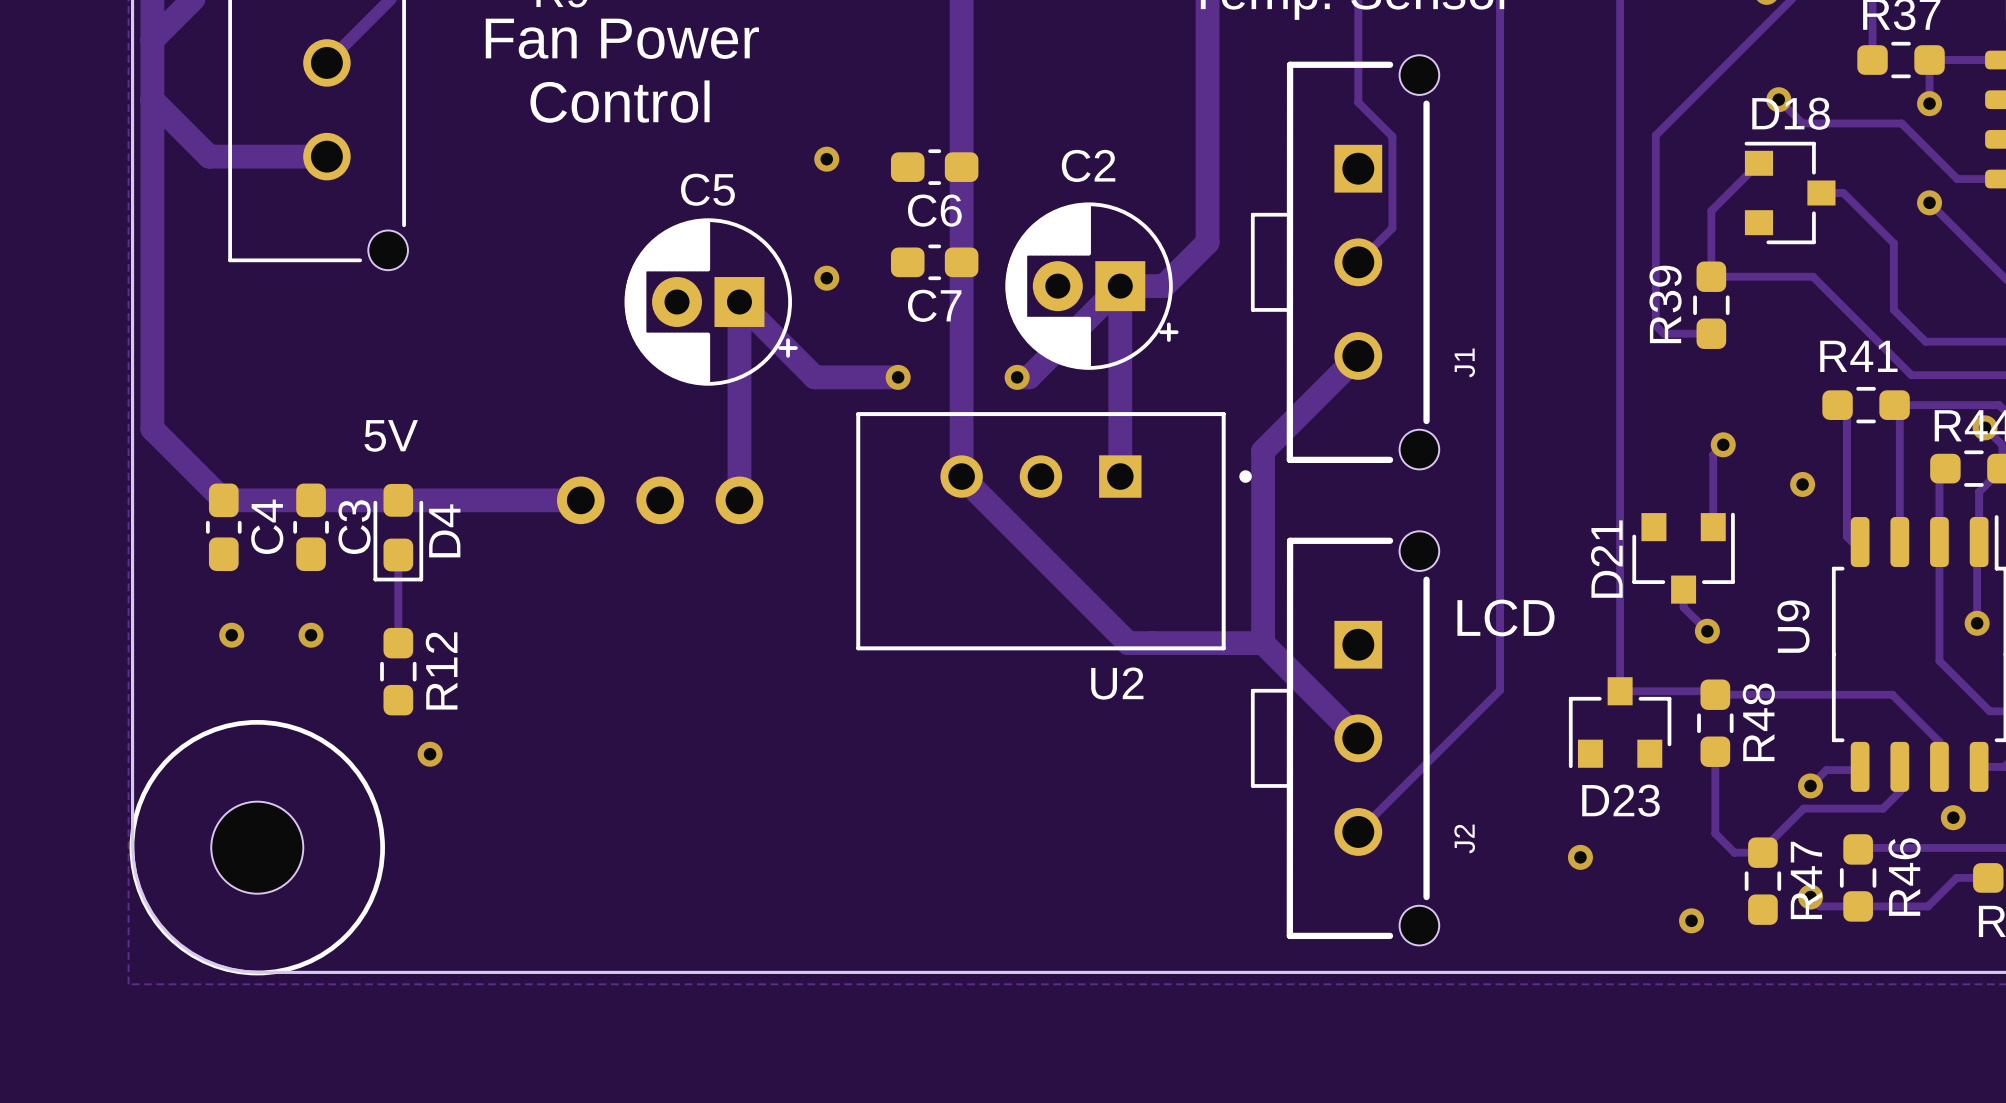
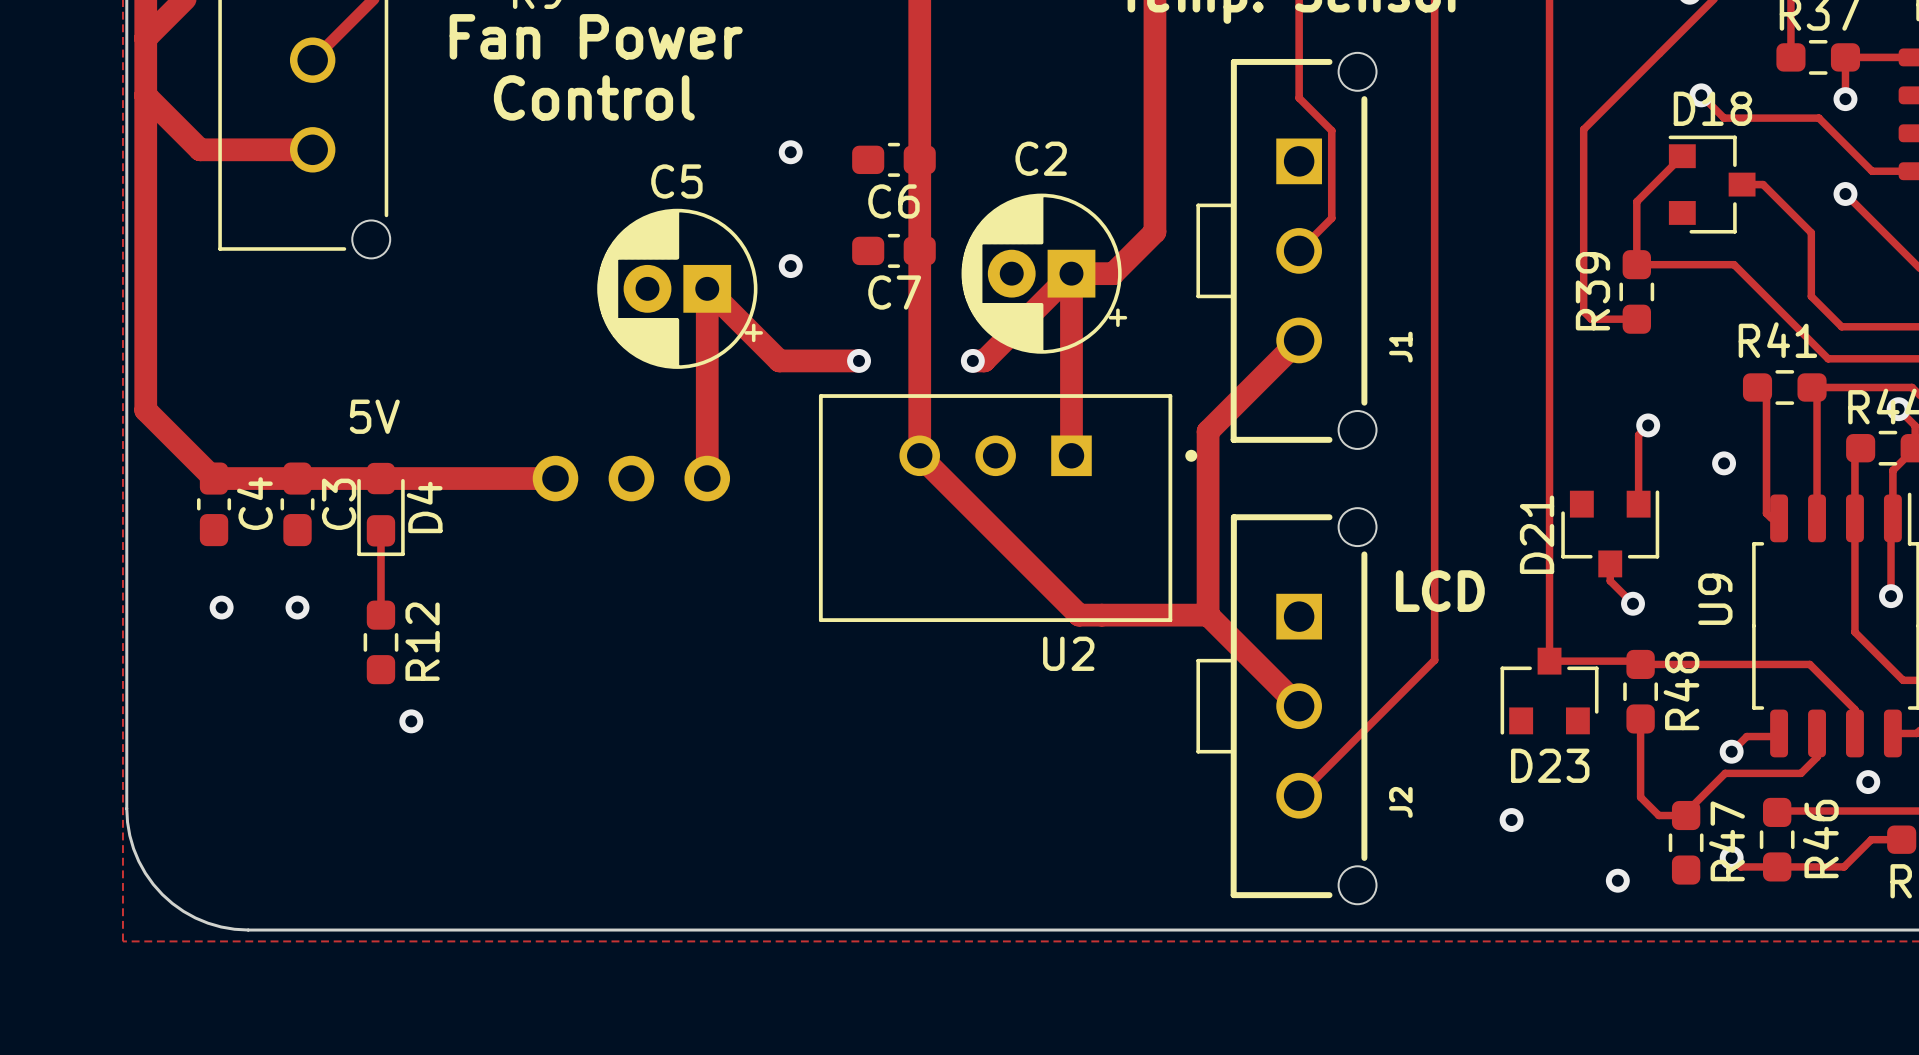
part: (257, 847) -> none

